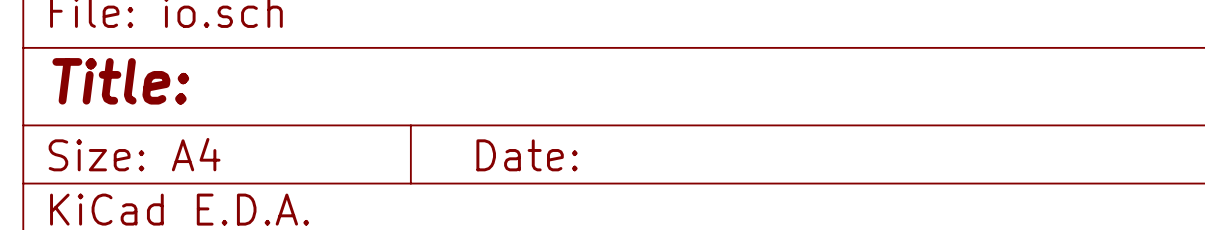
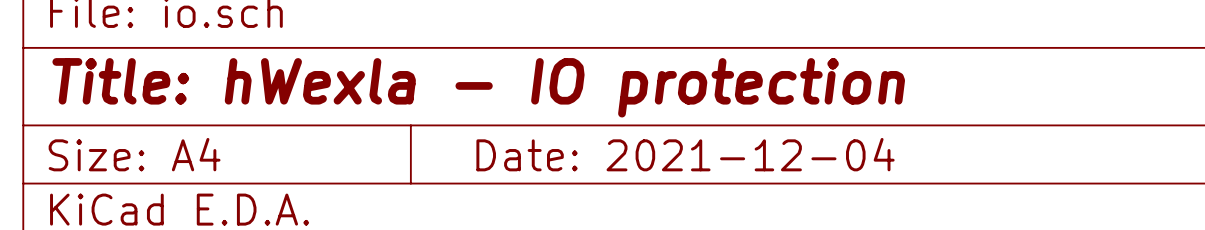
title block: Title: (120, 81) -> Title: hWexla - IO protection (478, 87)
title block: Date: (527, 155) -> Date: 2021-12-04 (685, 154)

